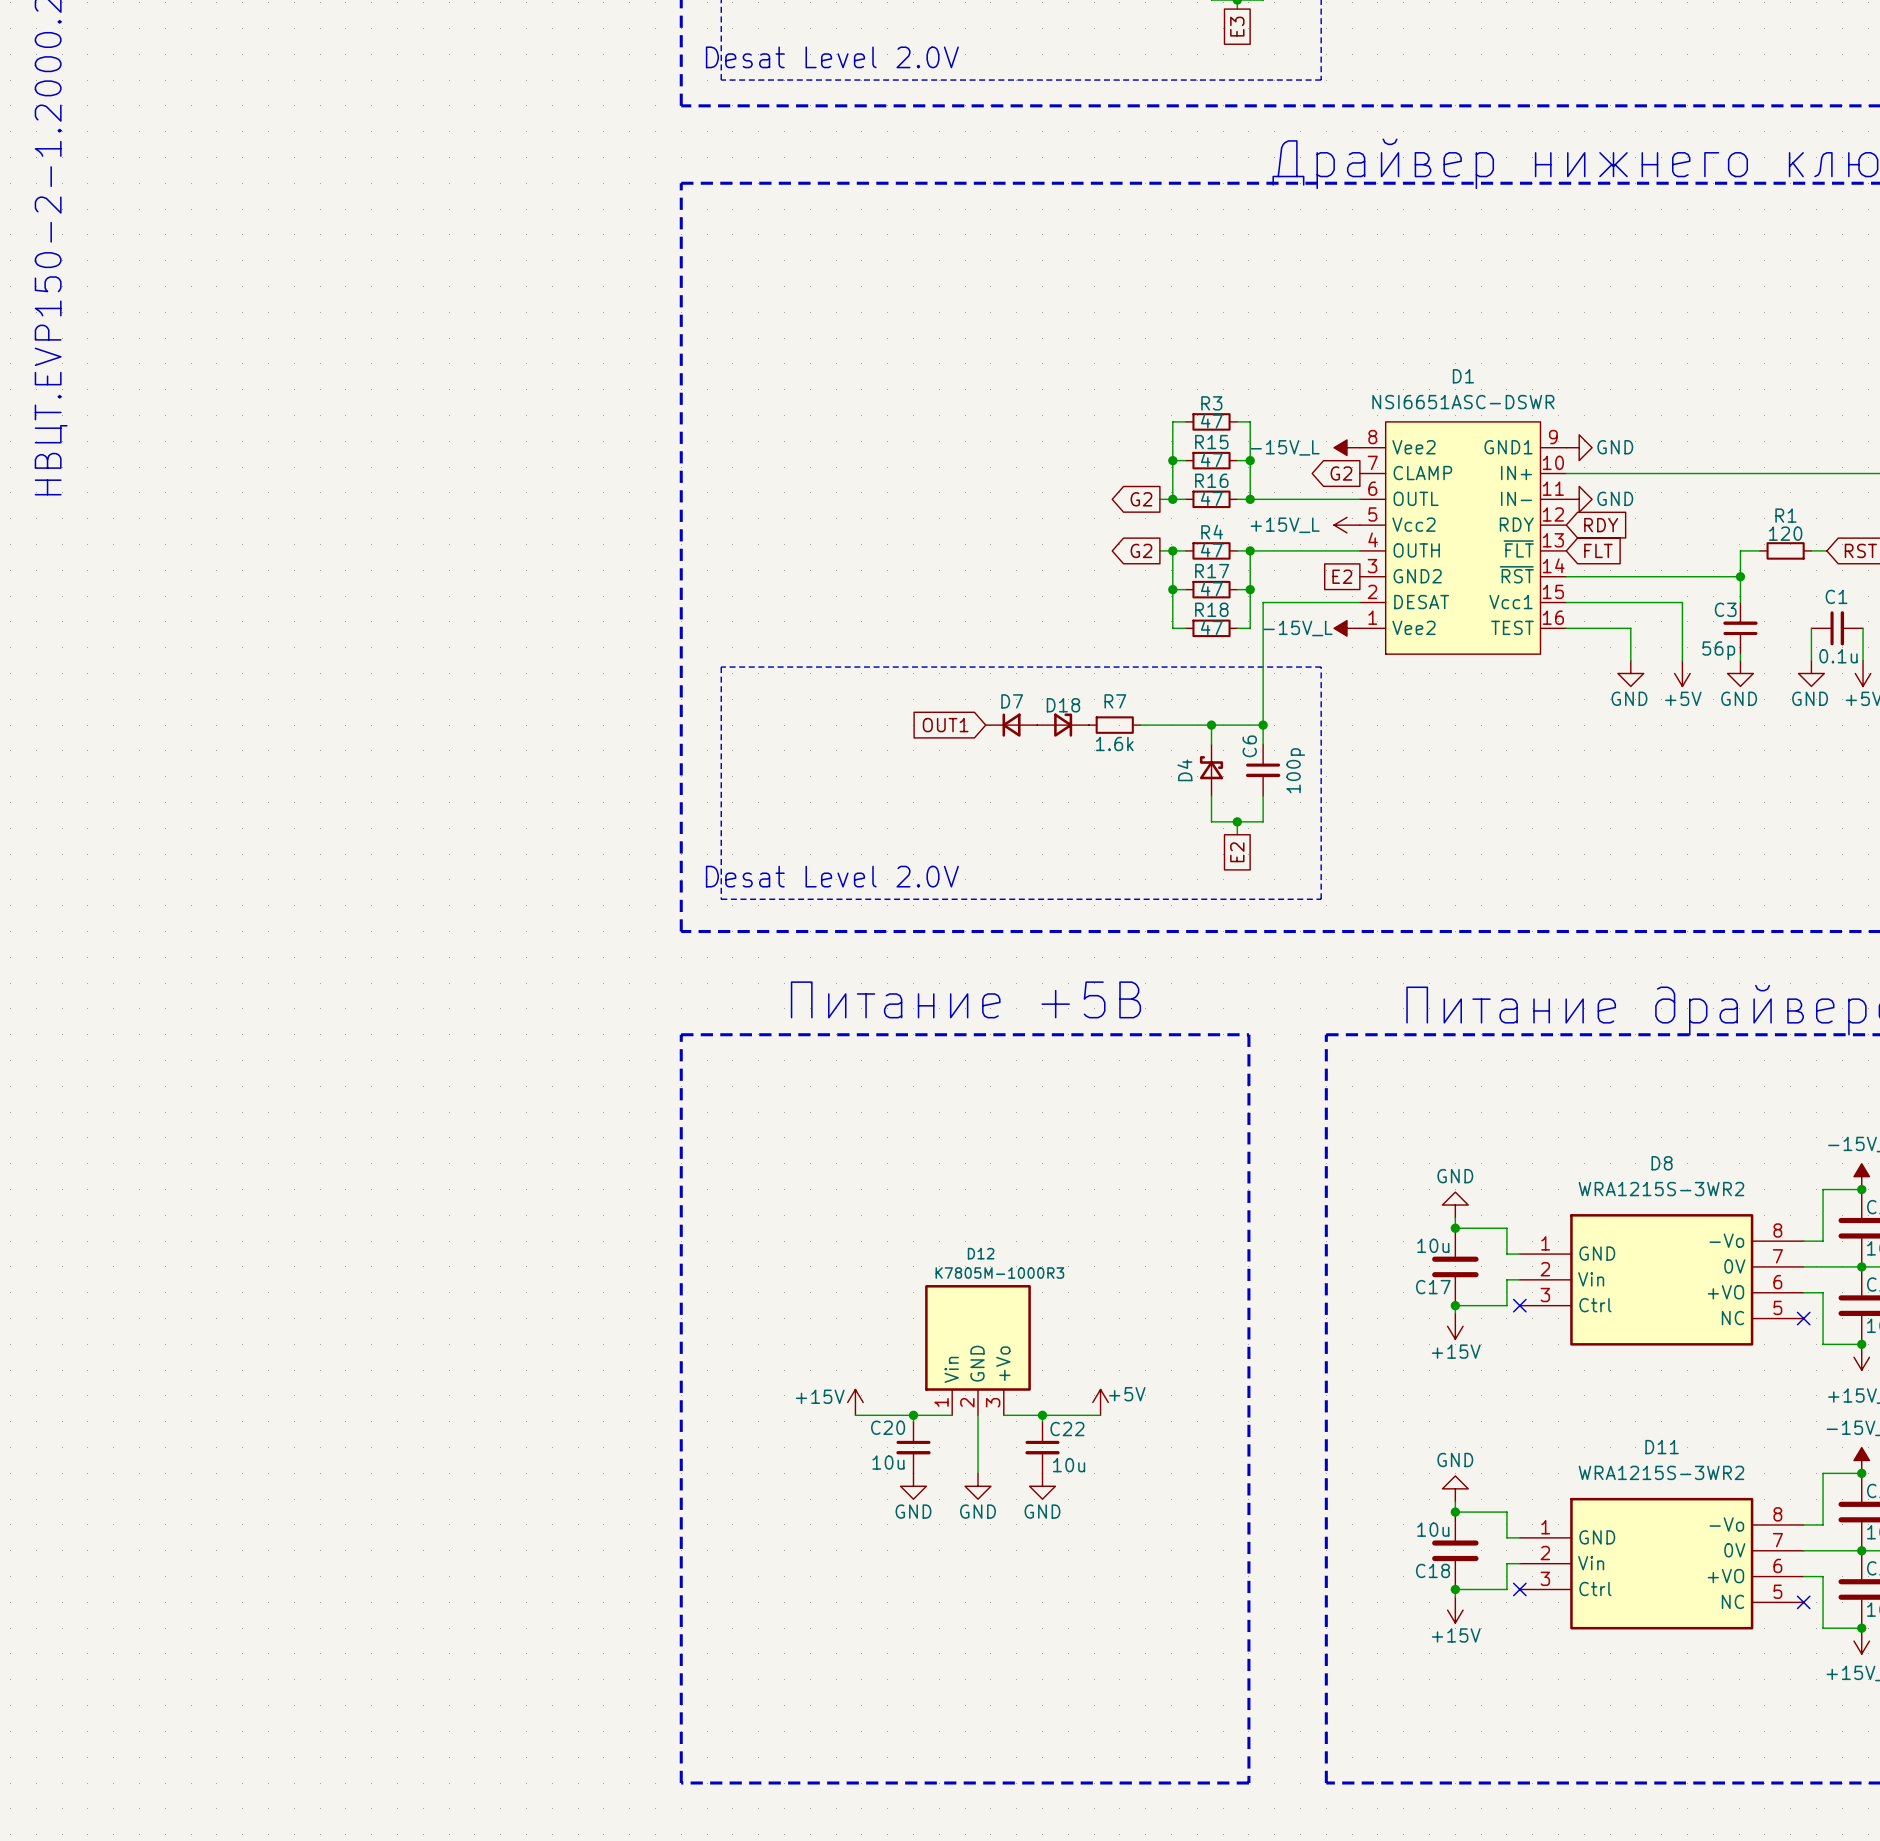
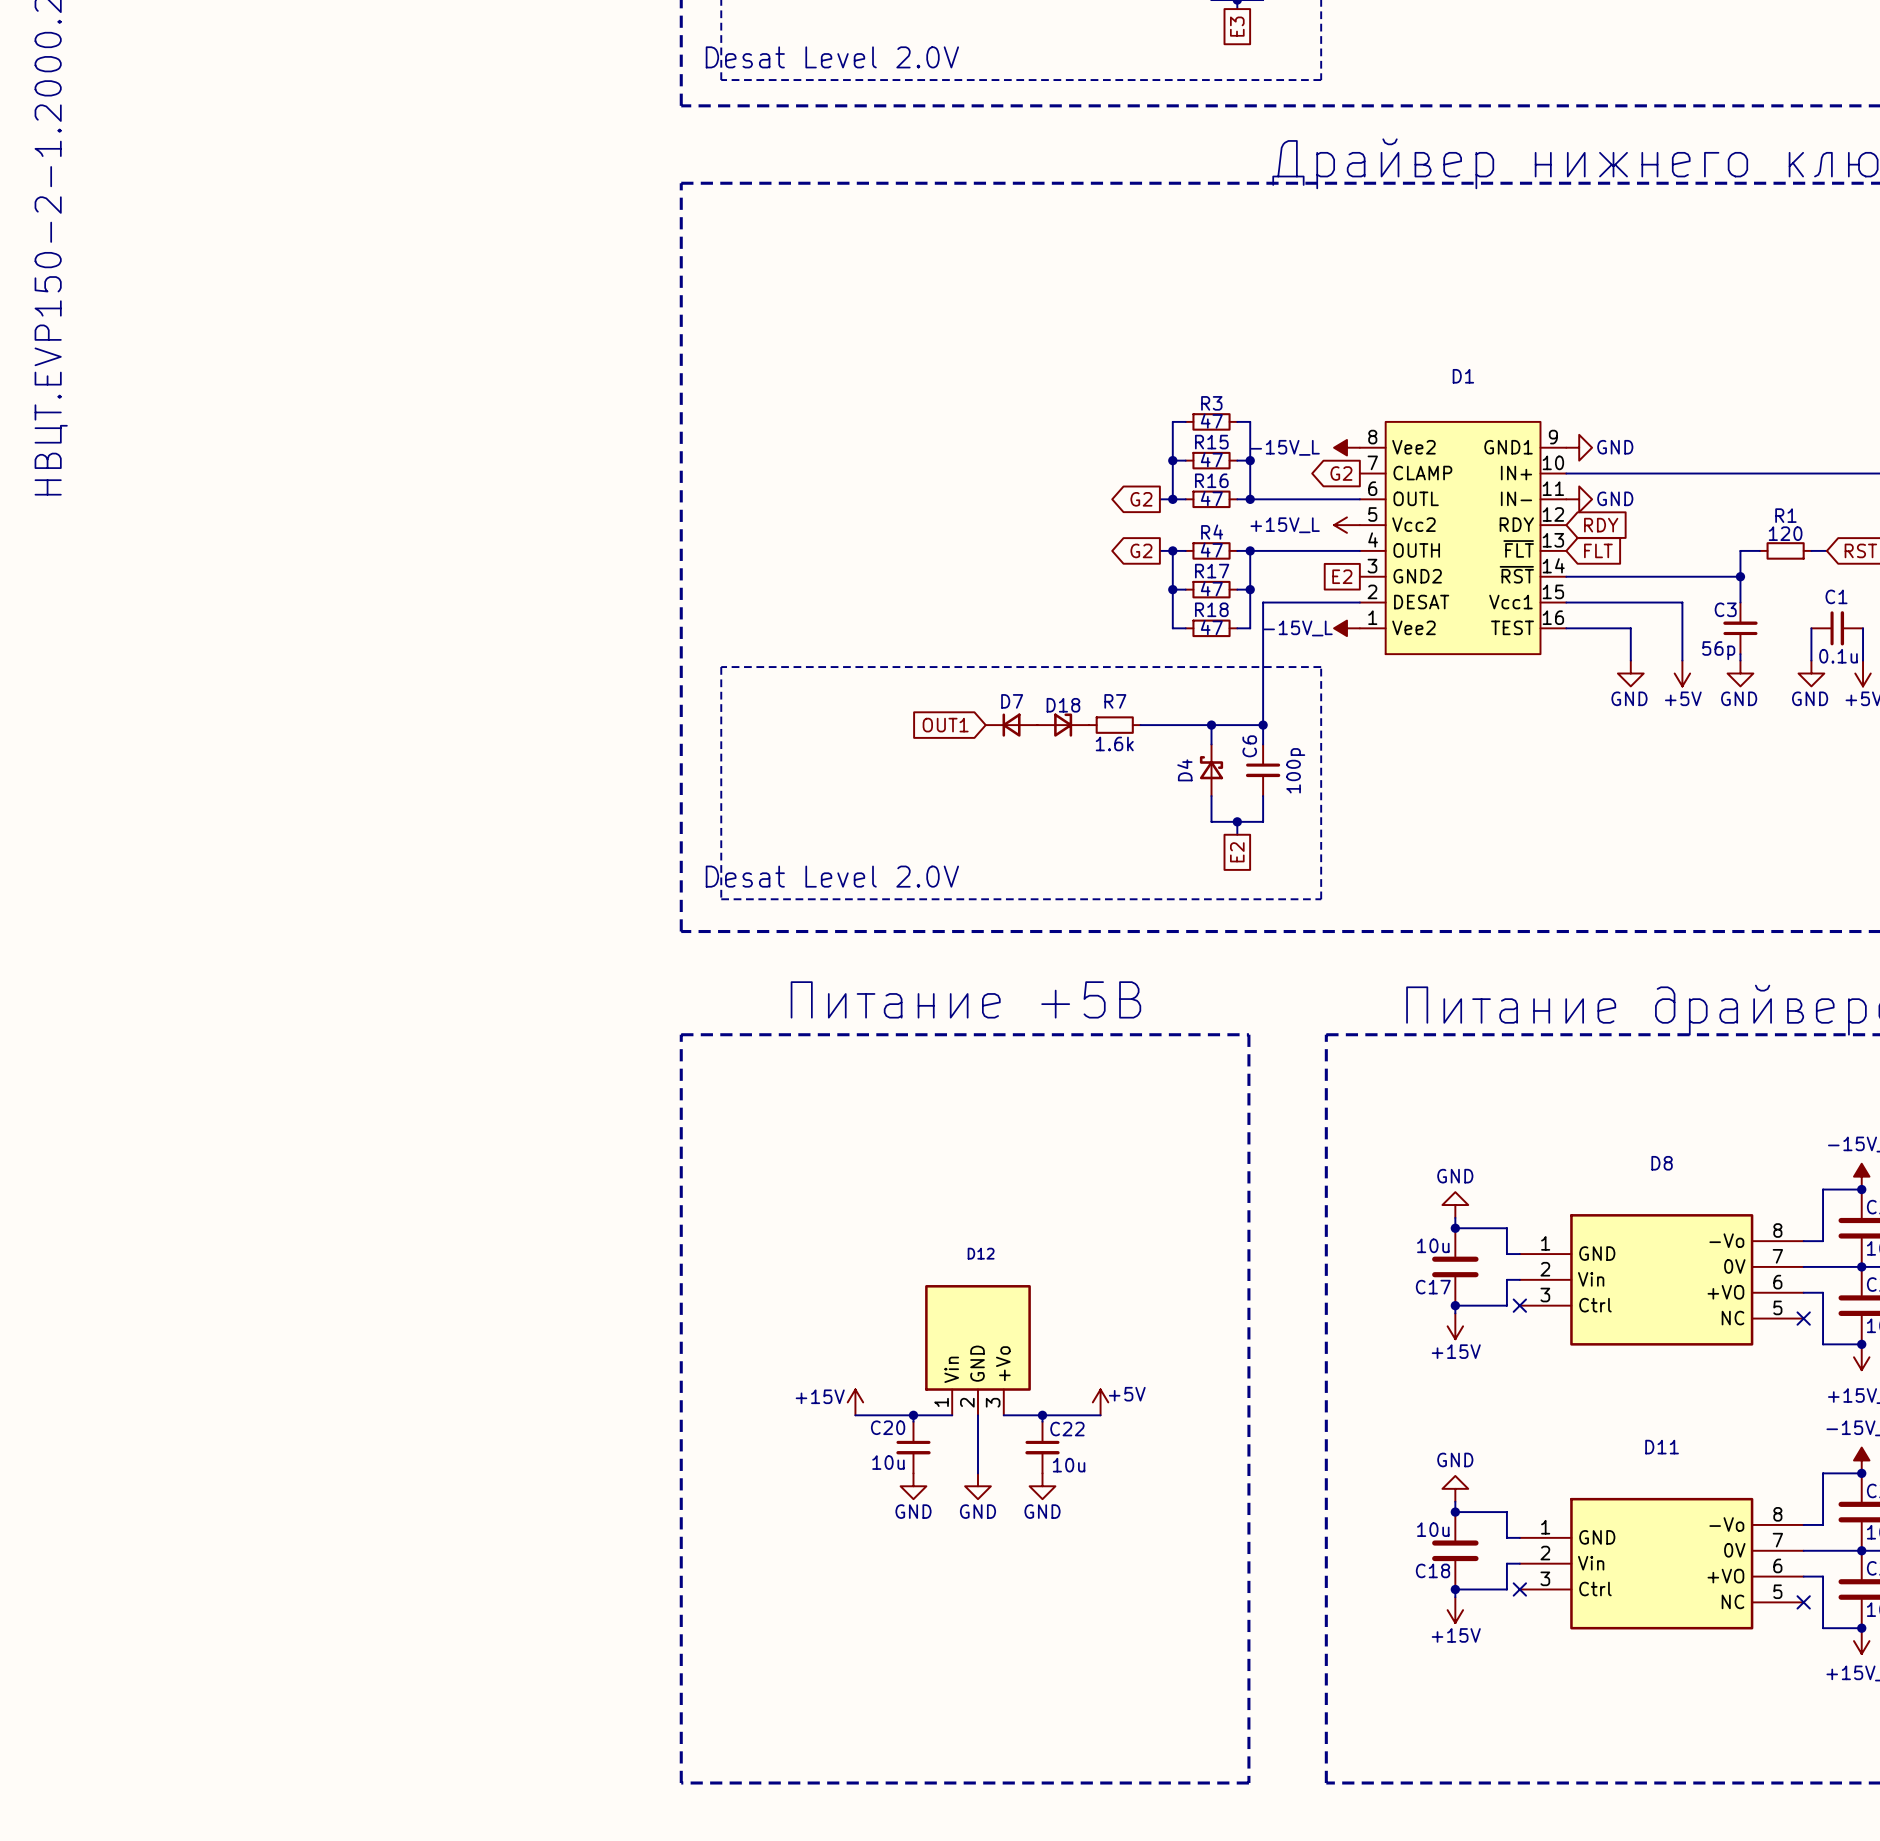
D1 value: NSI6651ASC-DSWR (1463, 402) -> none
D8 value: WRA1215S-3WR2 (1661, 1189) -> none
D12 value: K7805M-1000R3 (999, 1273) -> none
D11 value: WRA1215S-3WR2 (1661, 1472) -> none

